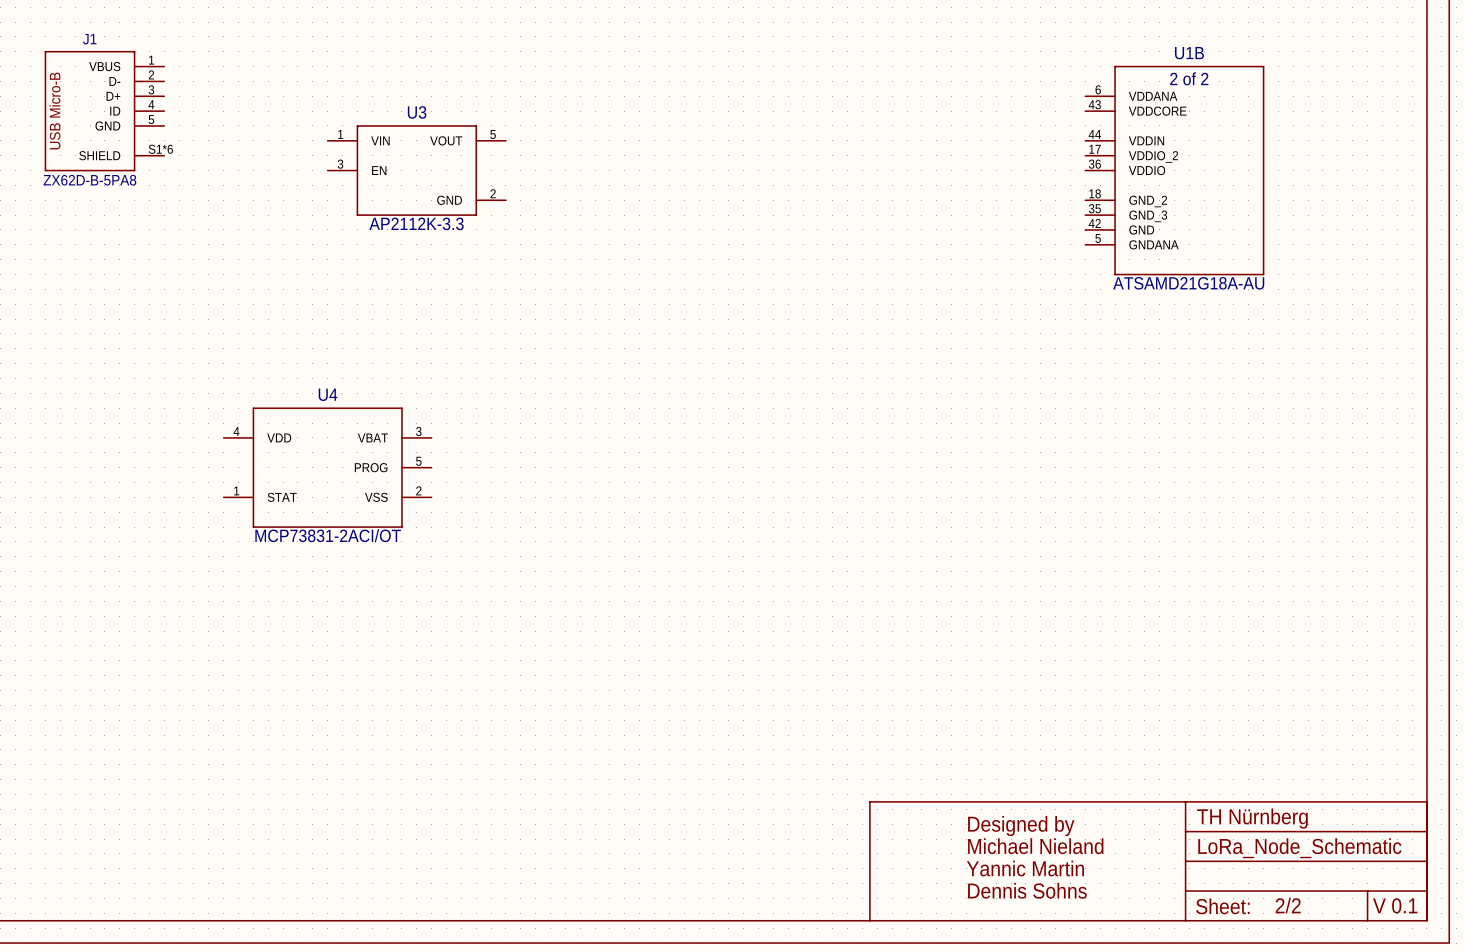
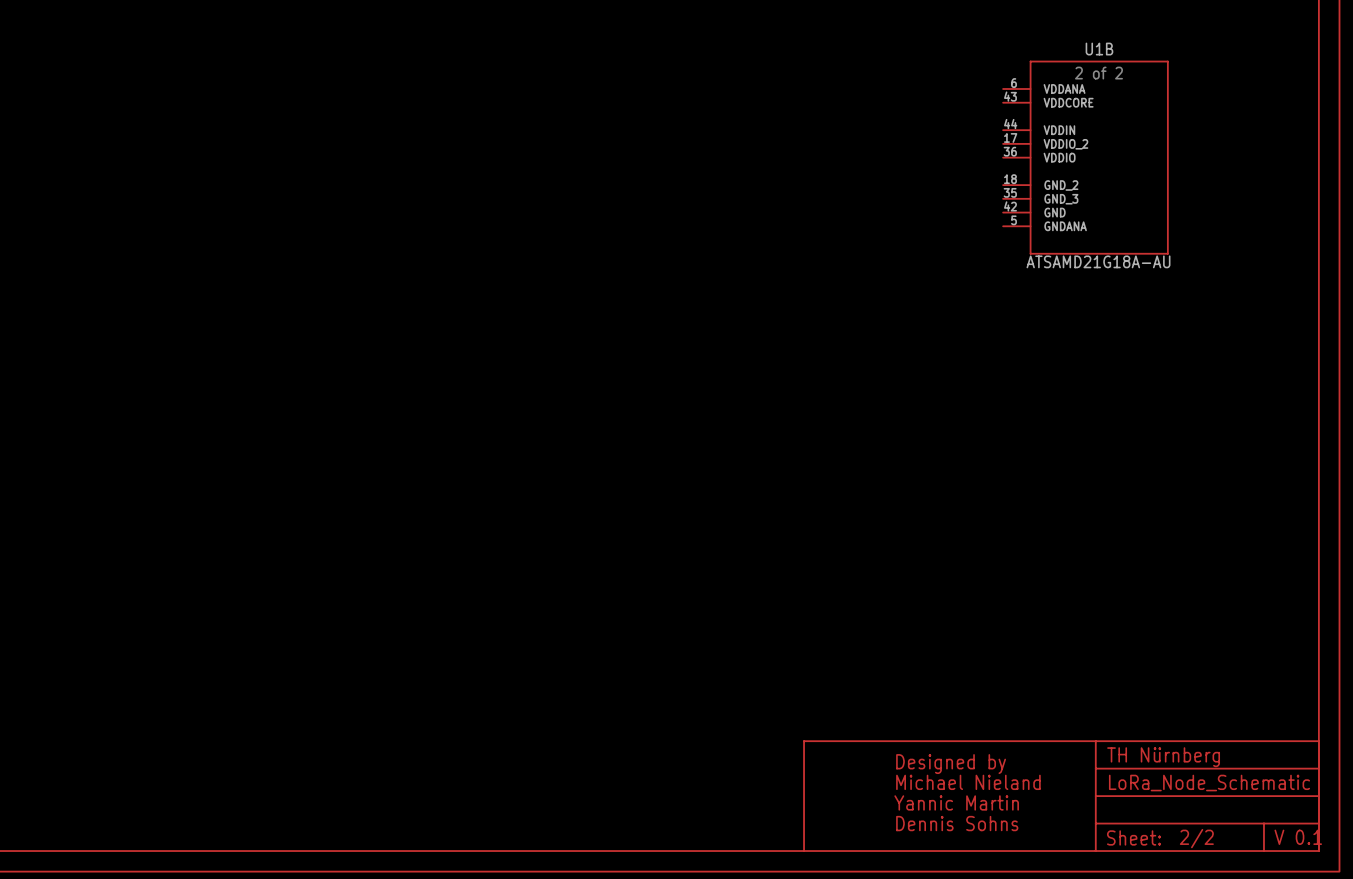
J1: ZX62D-B-5PA8 (104, 111) -> none
U3: AP2112K-3.3 (416, 170) -> none
U4: MCP73831-2ACI/OT (327, 467) -> none

